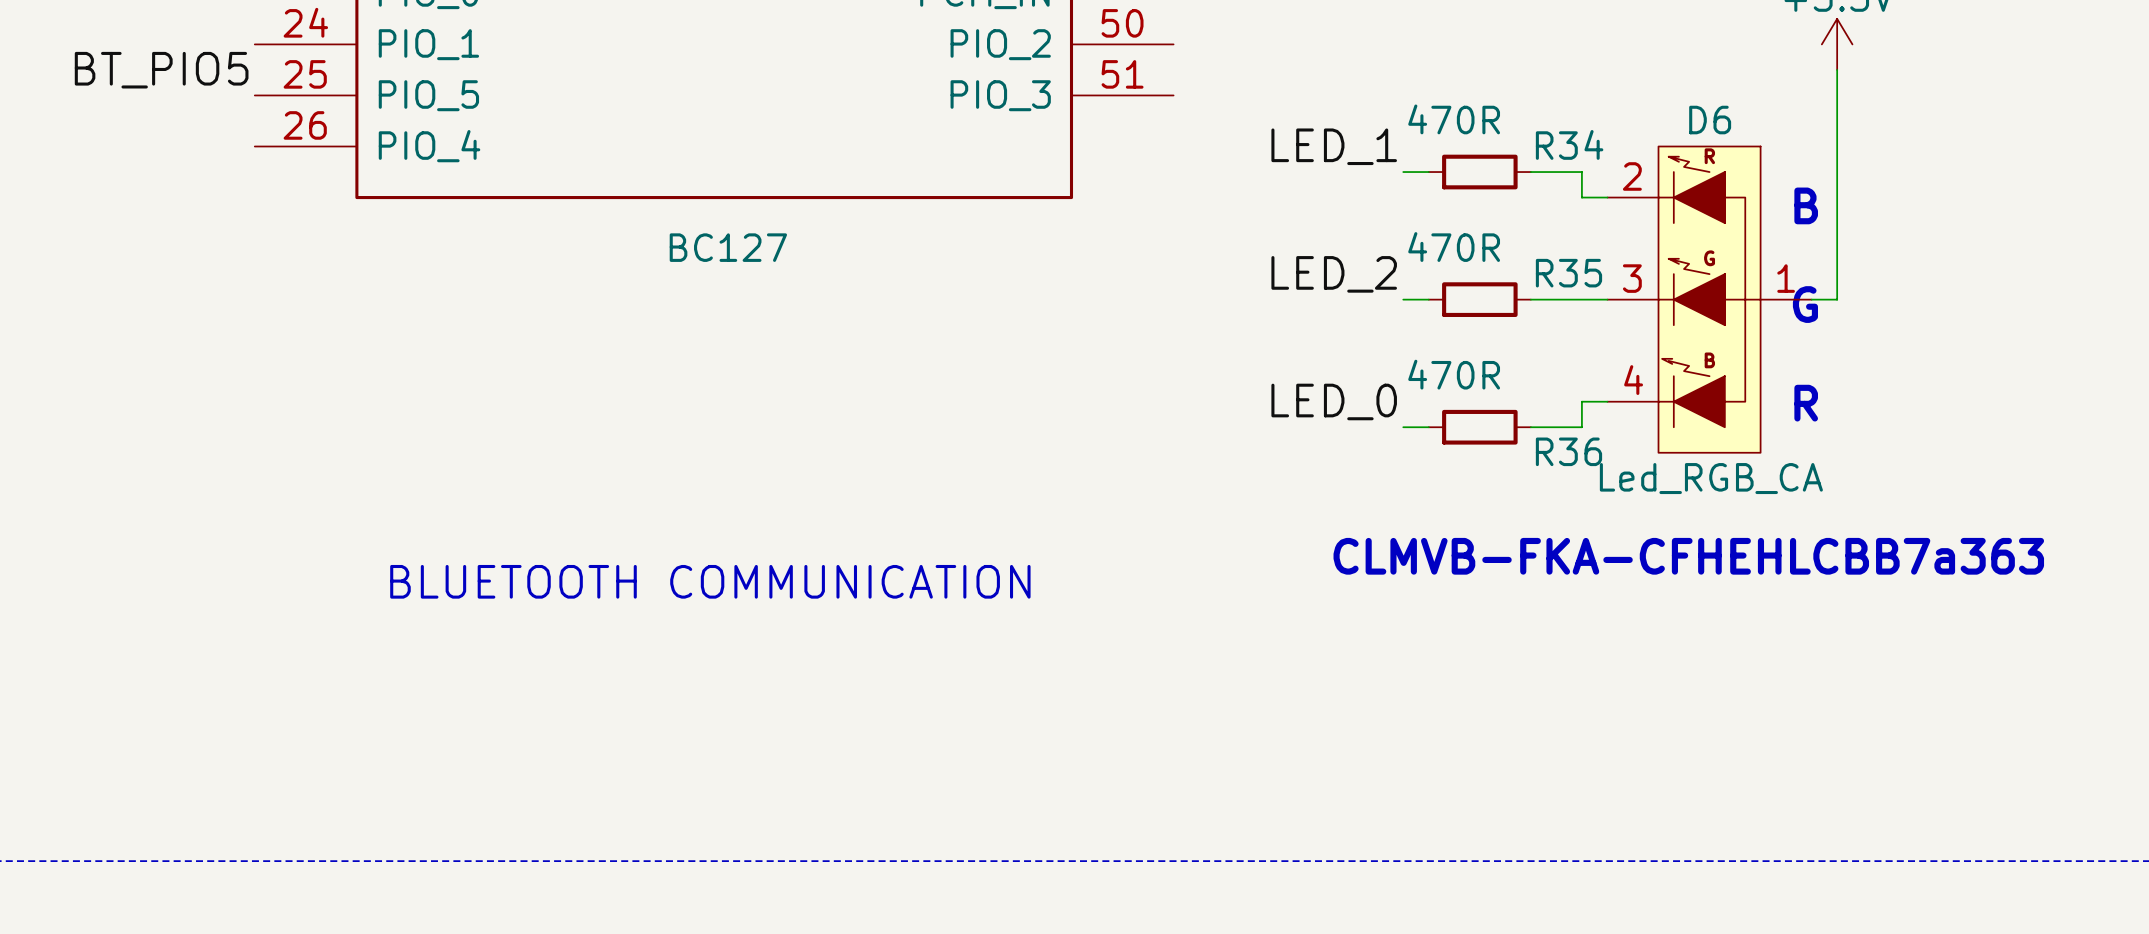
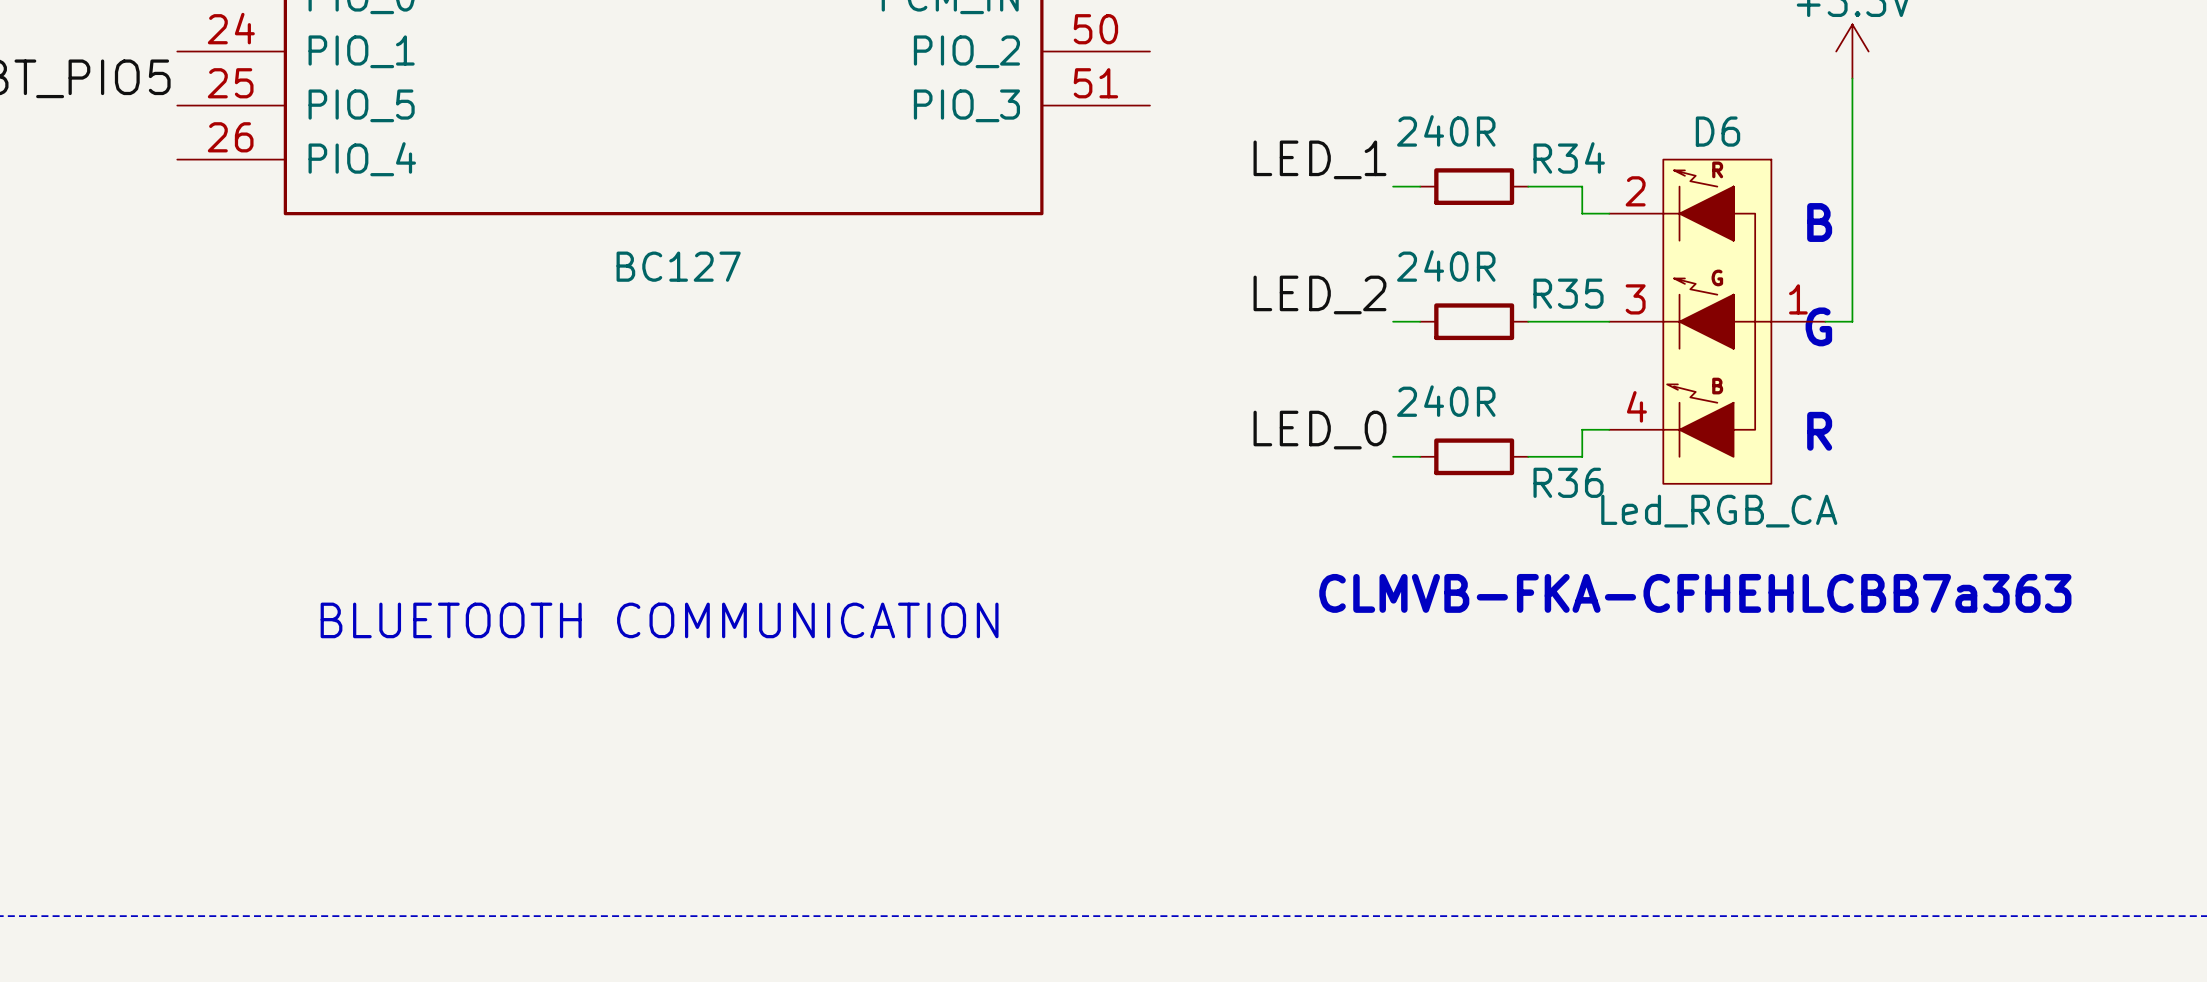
R34 value: 470R (1454, 119) -> 240R (1446, 130)
R35 value: 470R (1454, 247) -> 240R (1446, 266)
R36 value: 470R (1454, 374) -> 240R (1446, 401)

